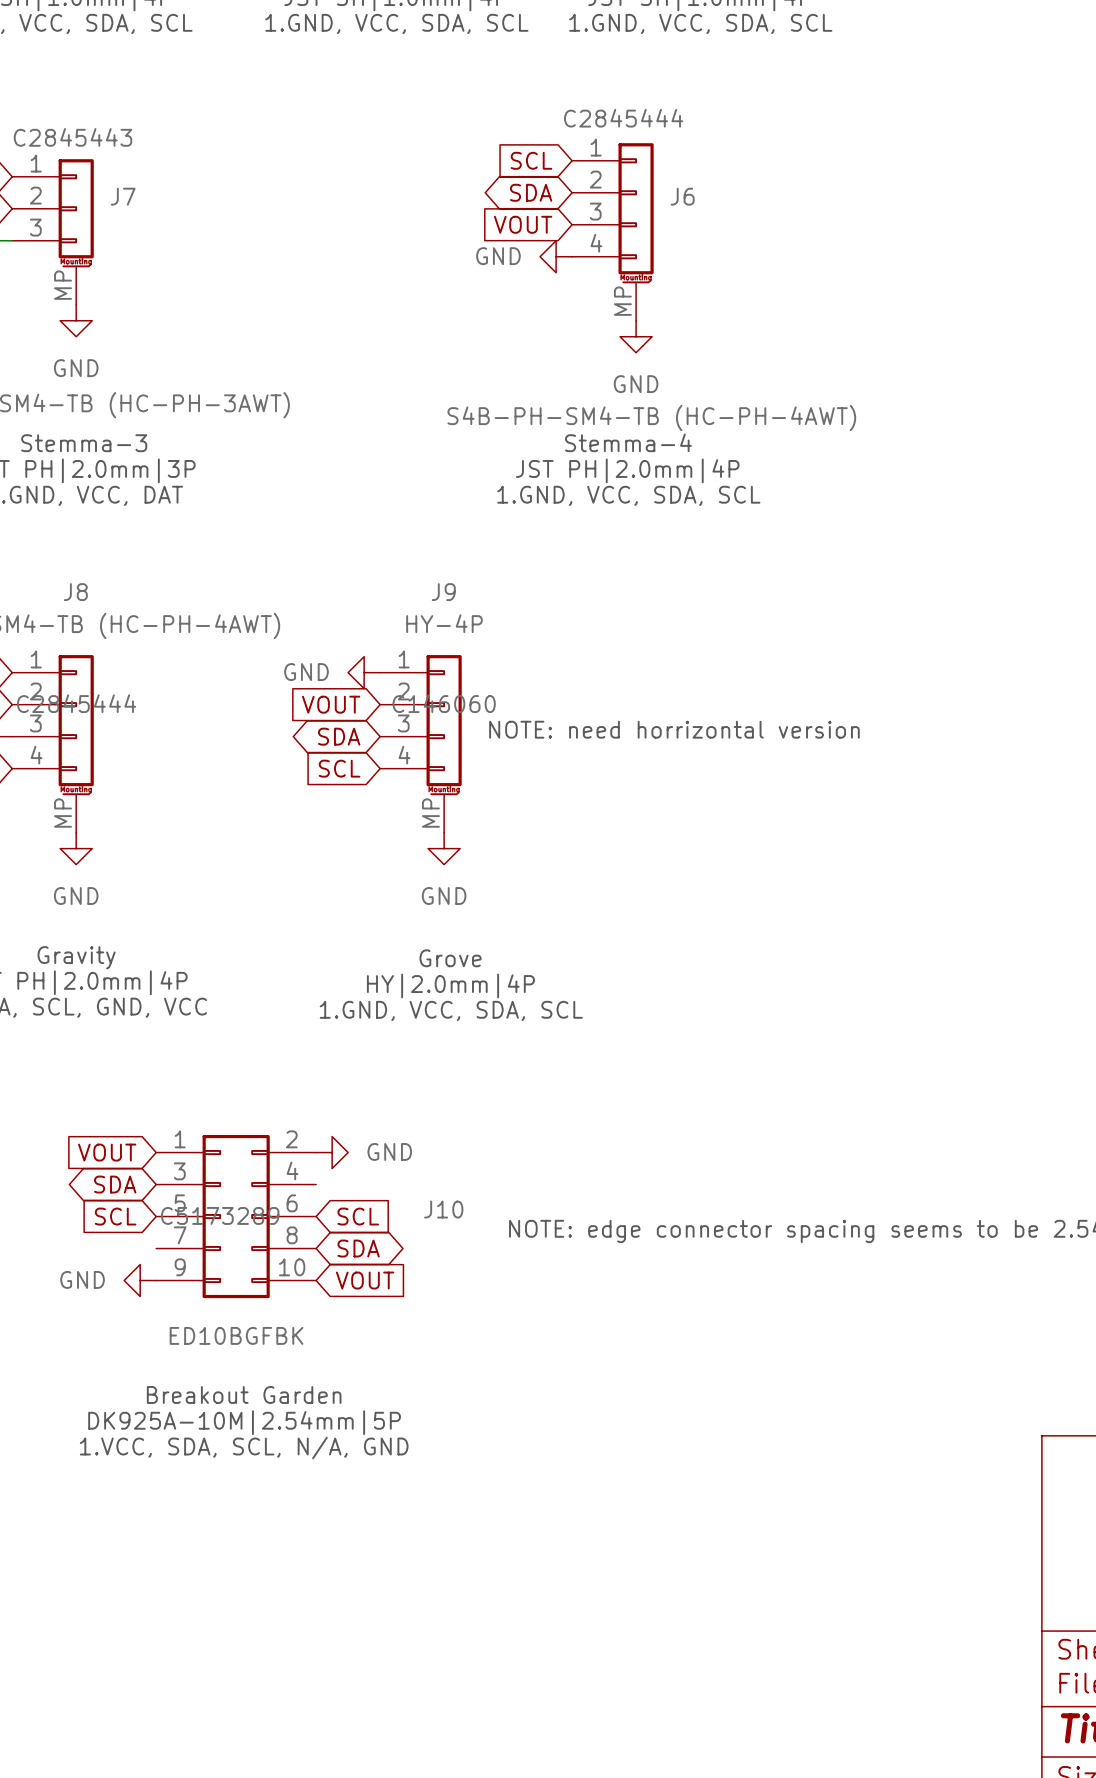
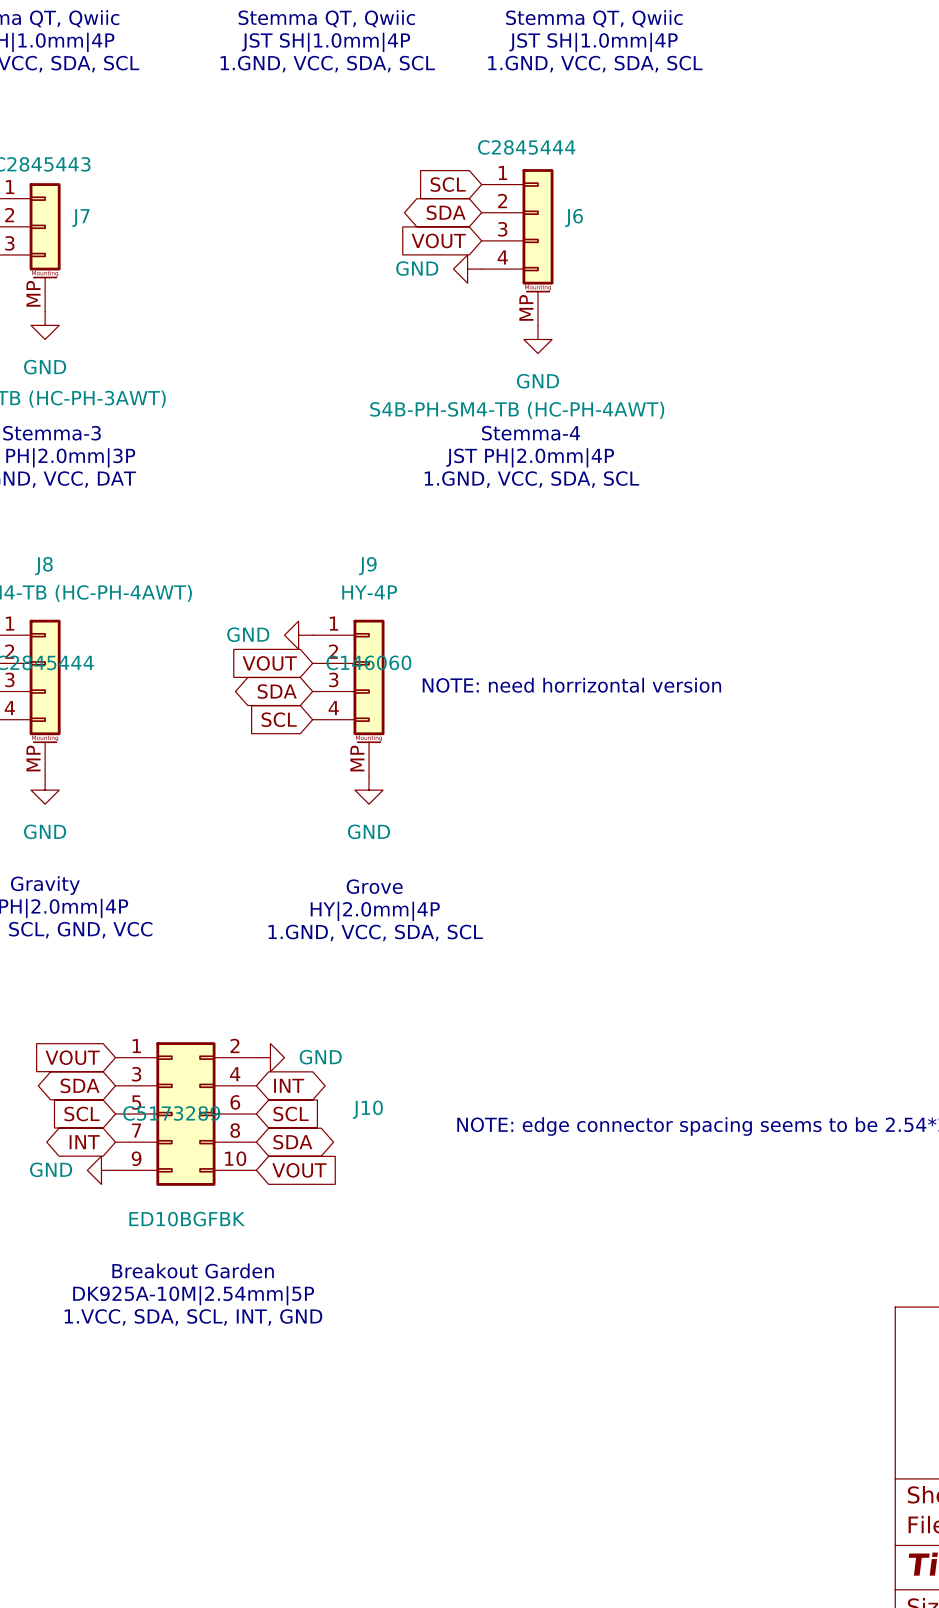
global label: none -> INT (289, 1085)
global label: none -> INT (84, 1142)
text: 1.VCC, SDA, SCL, N/A, GND (244, 1448) -> 1.VCC, SDA, SCL, INT, GND (193, 1317)

